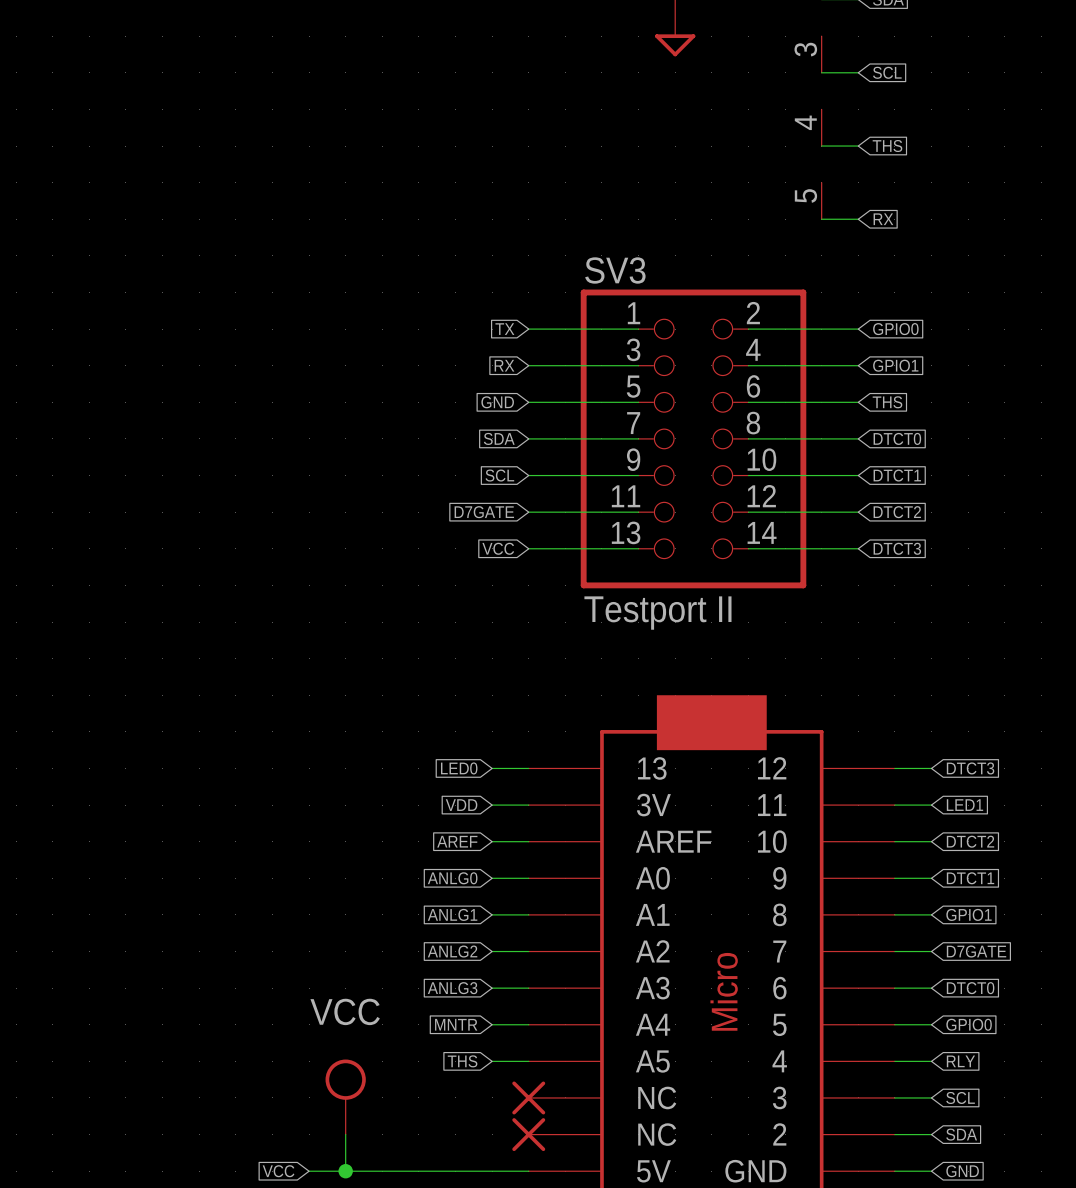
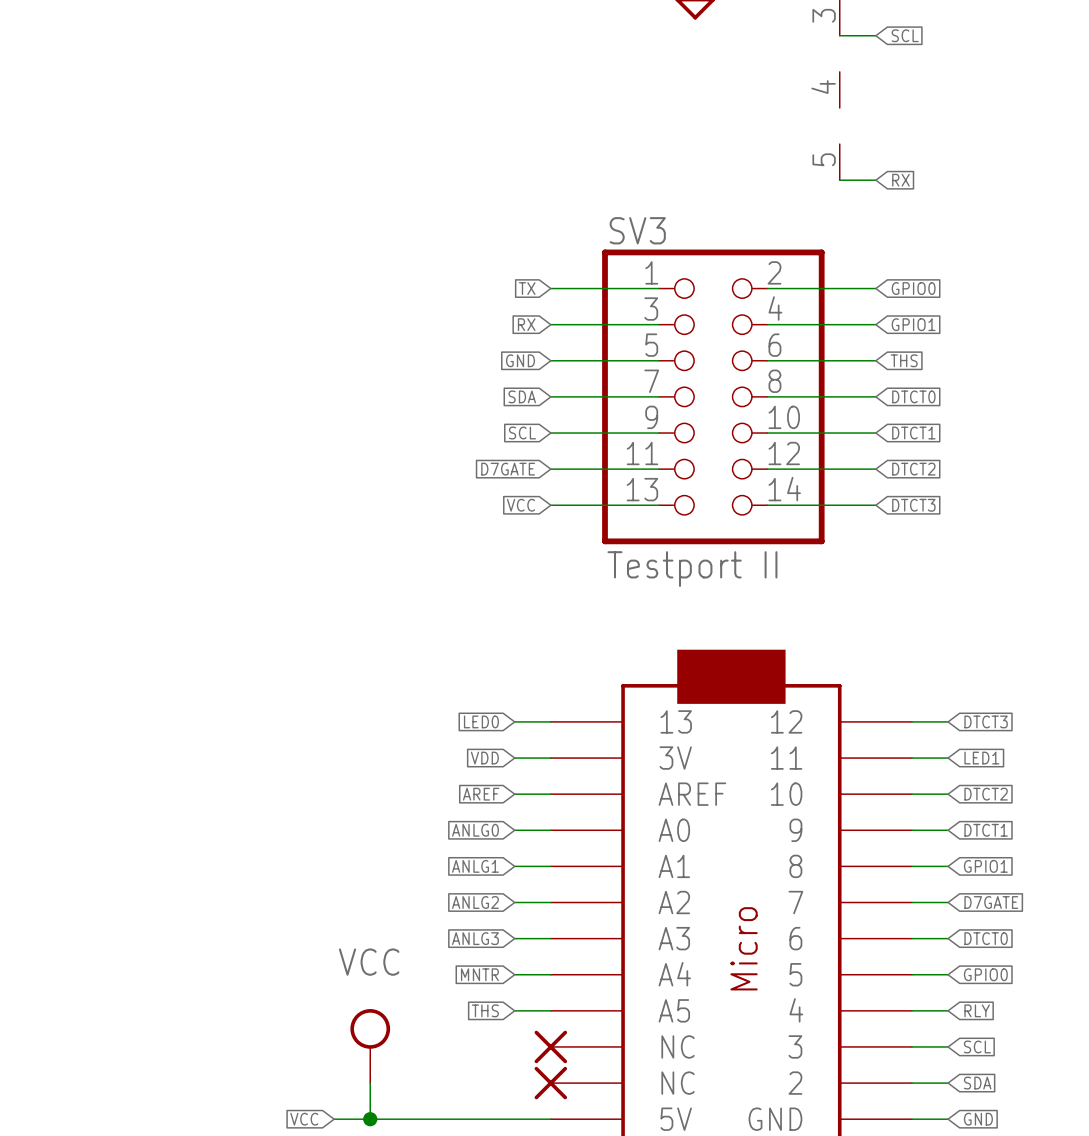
wire: (821, 146) (858, 146) -> none
global label: THS (887, 146) -> none

